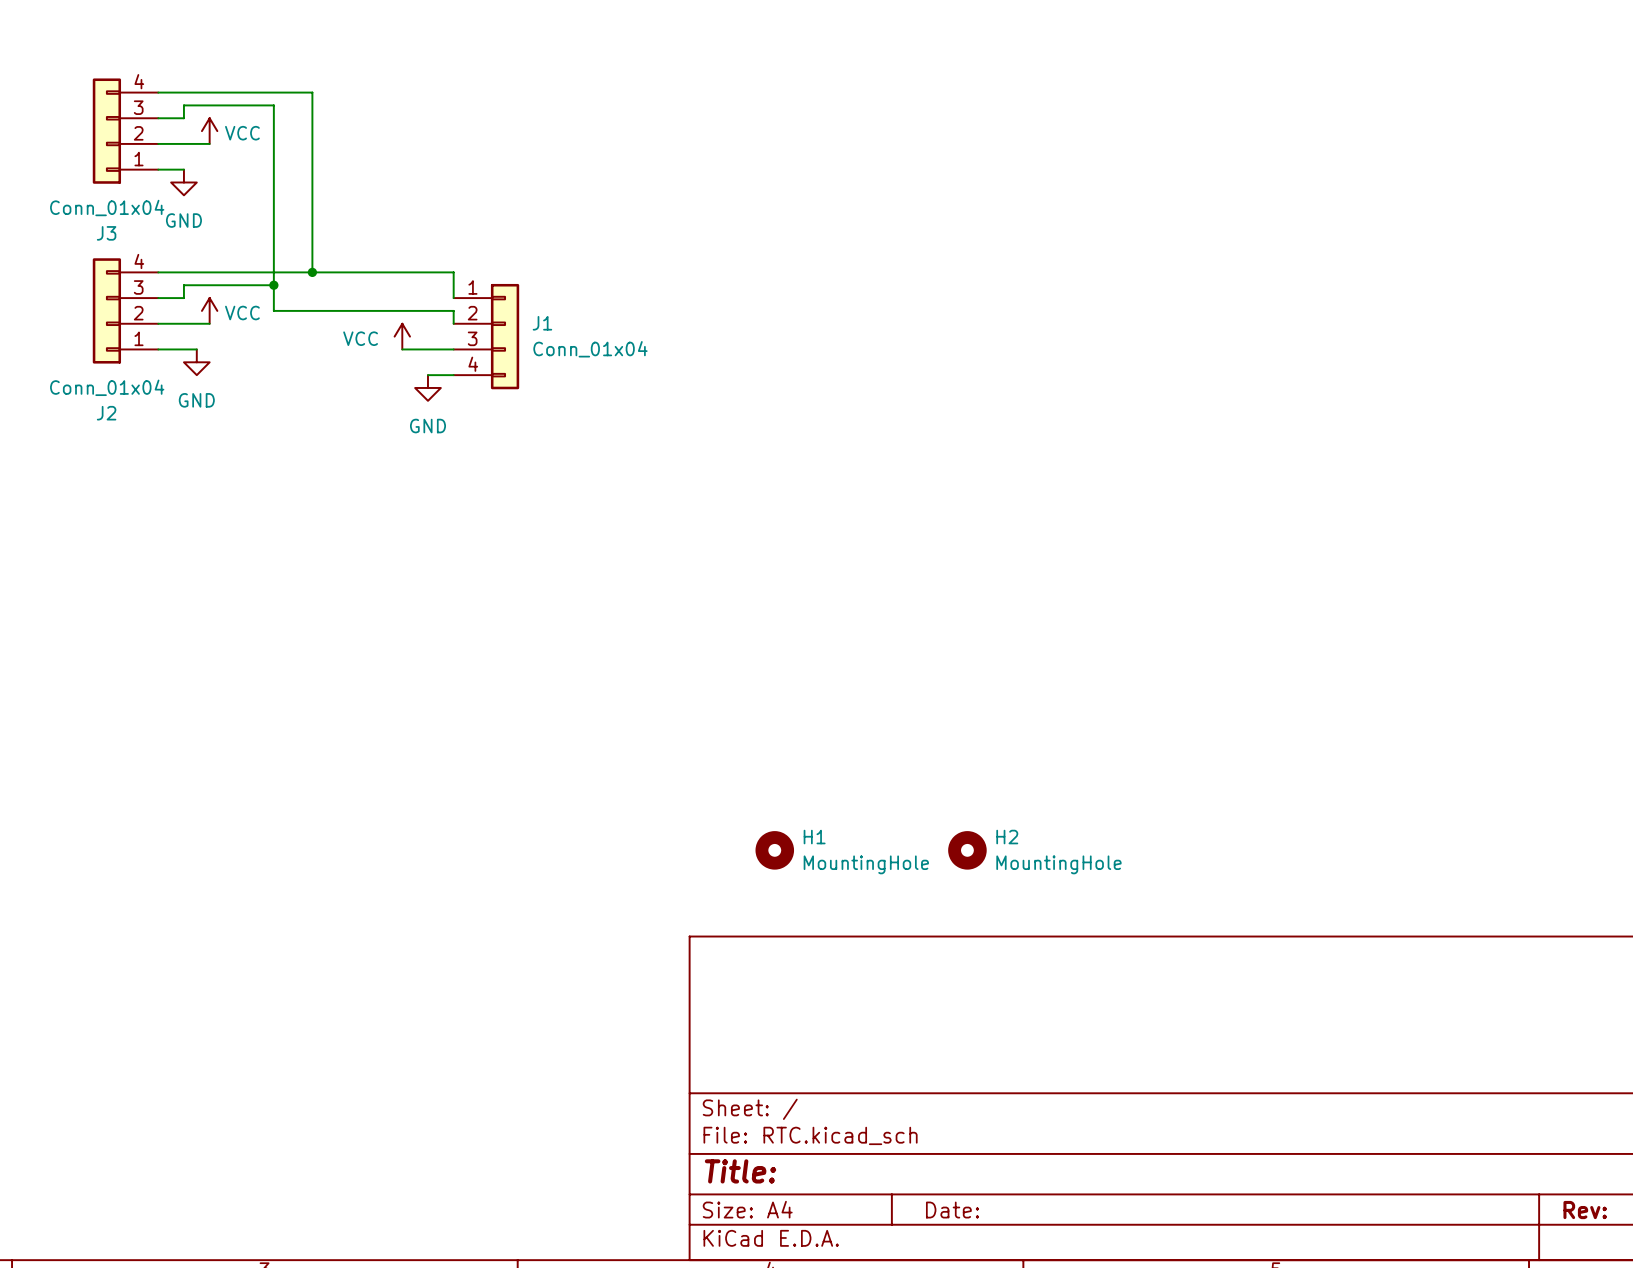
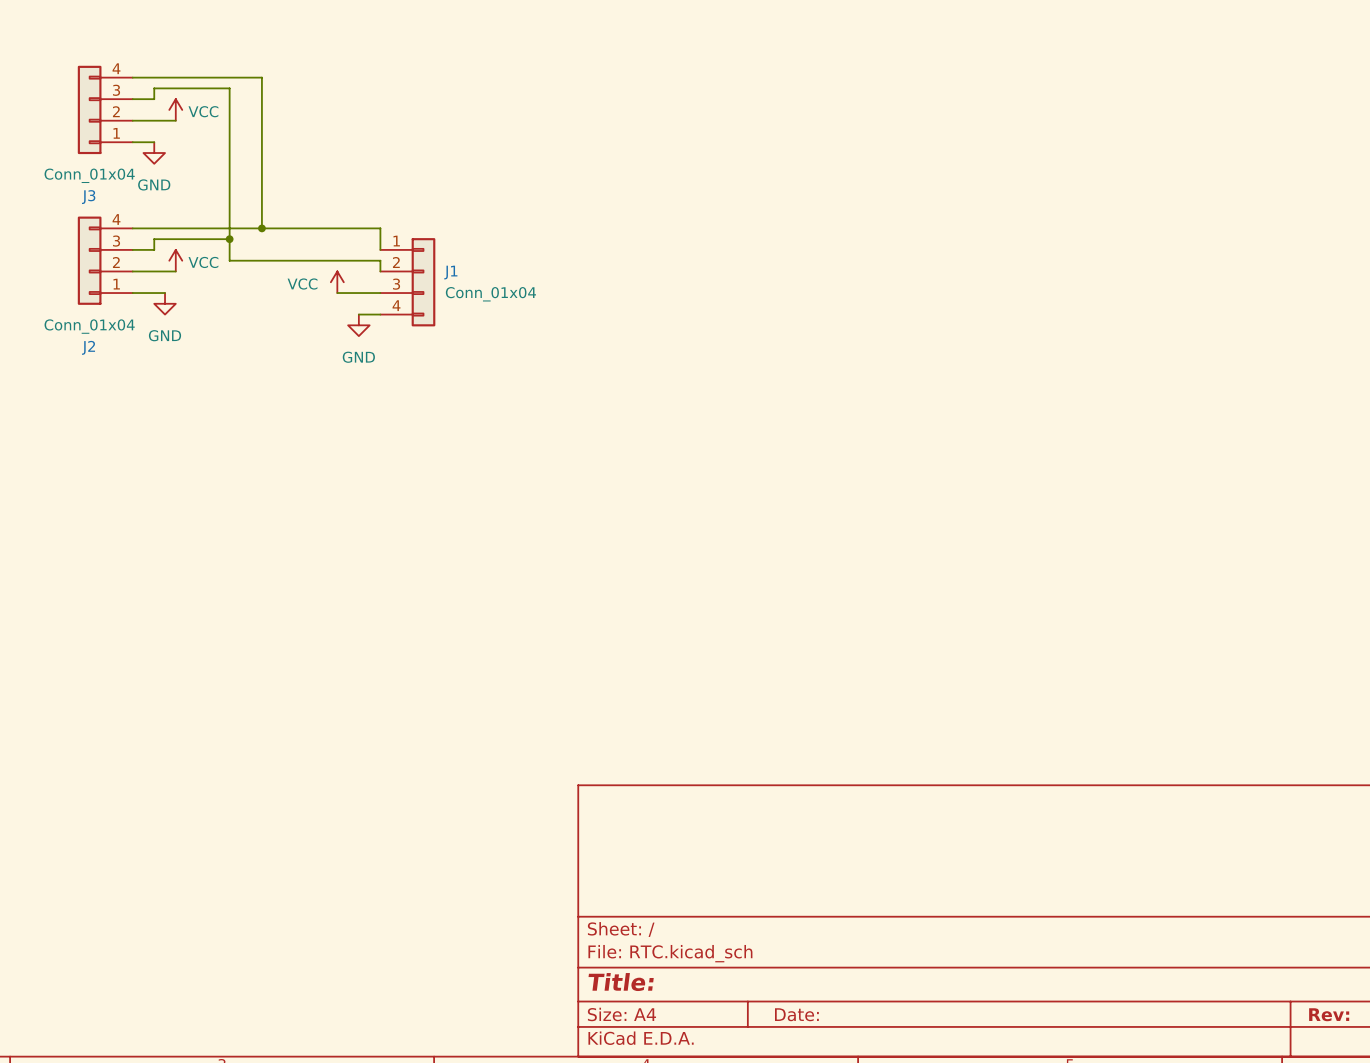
H1: MountingHole (774, 850) -> none
H2: MountingHole (967, 850) -> none

